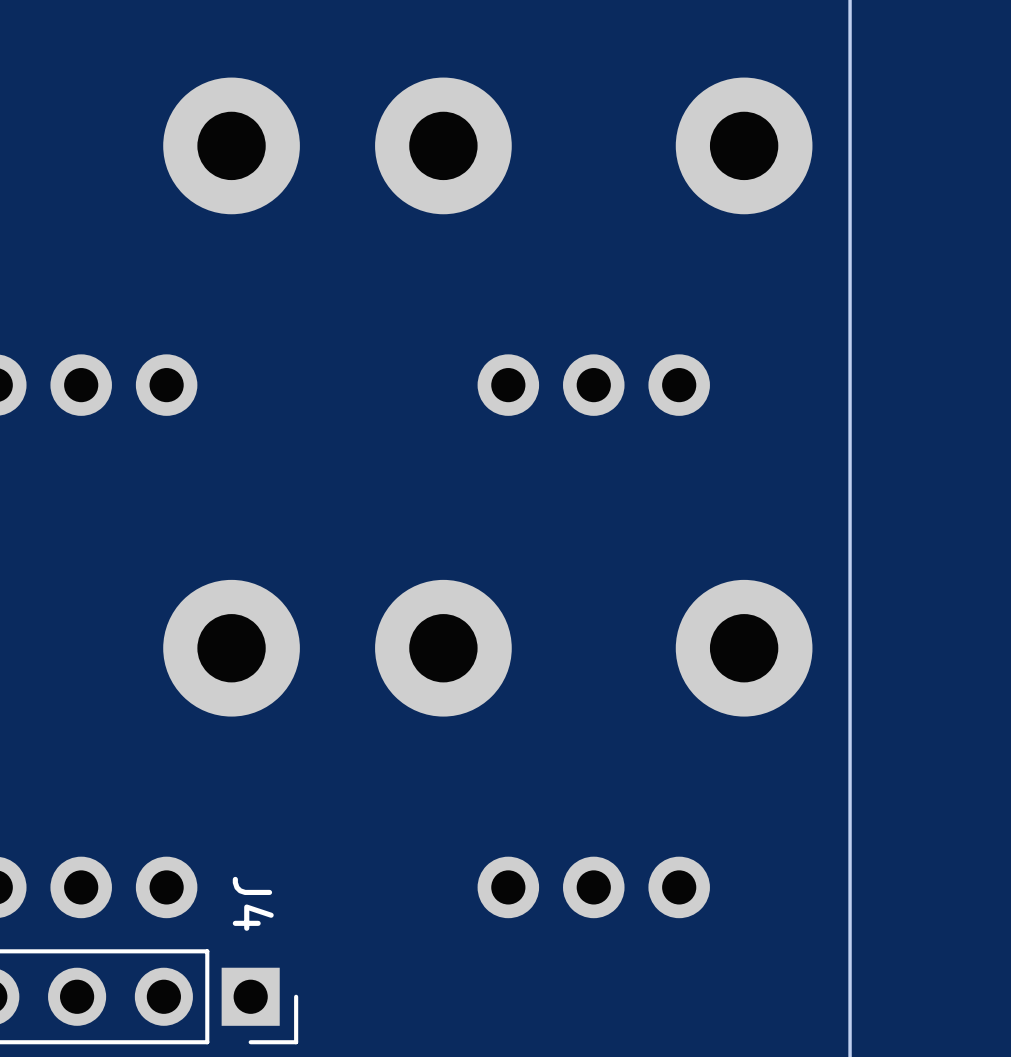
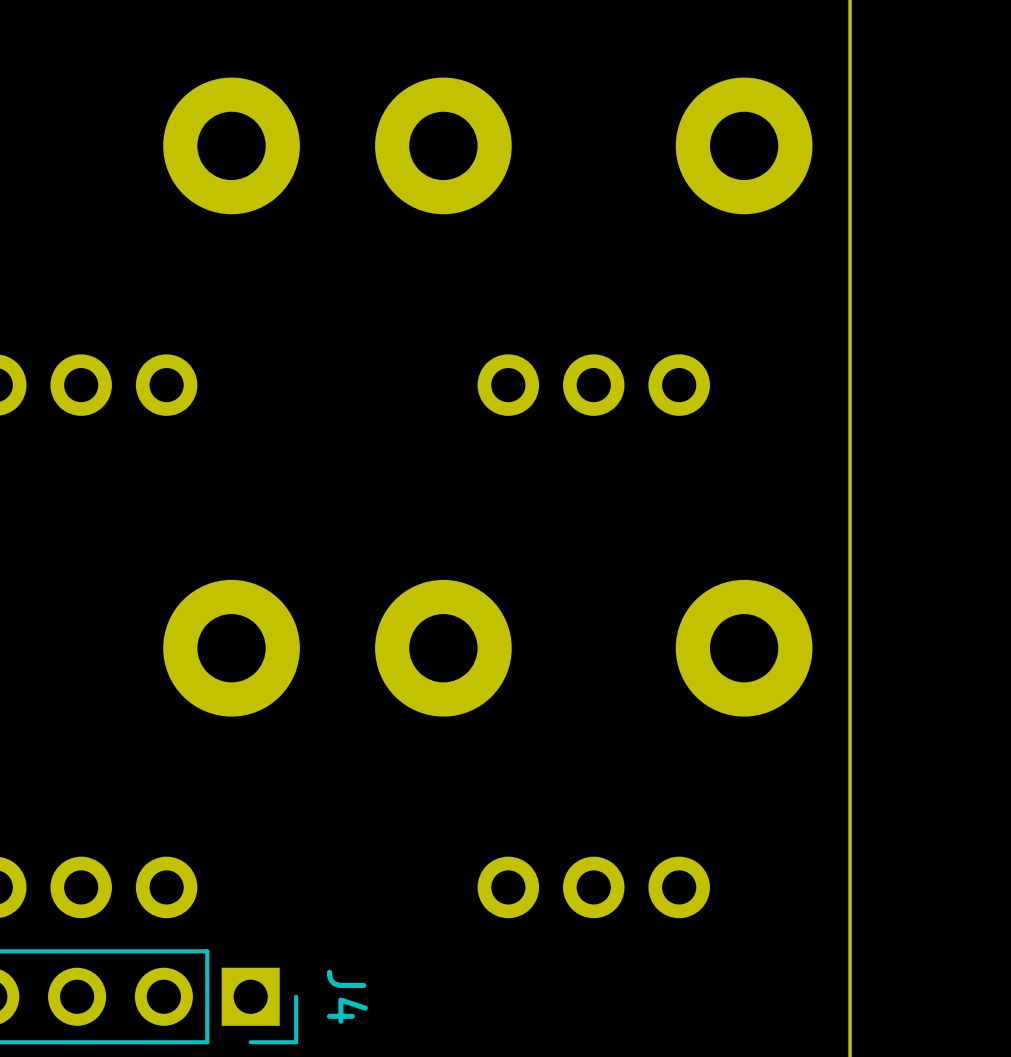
J4 name position: J4 (253, 903) -> J4 (347, 996)

